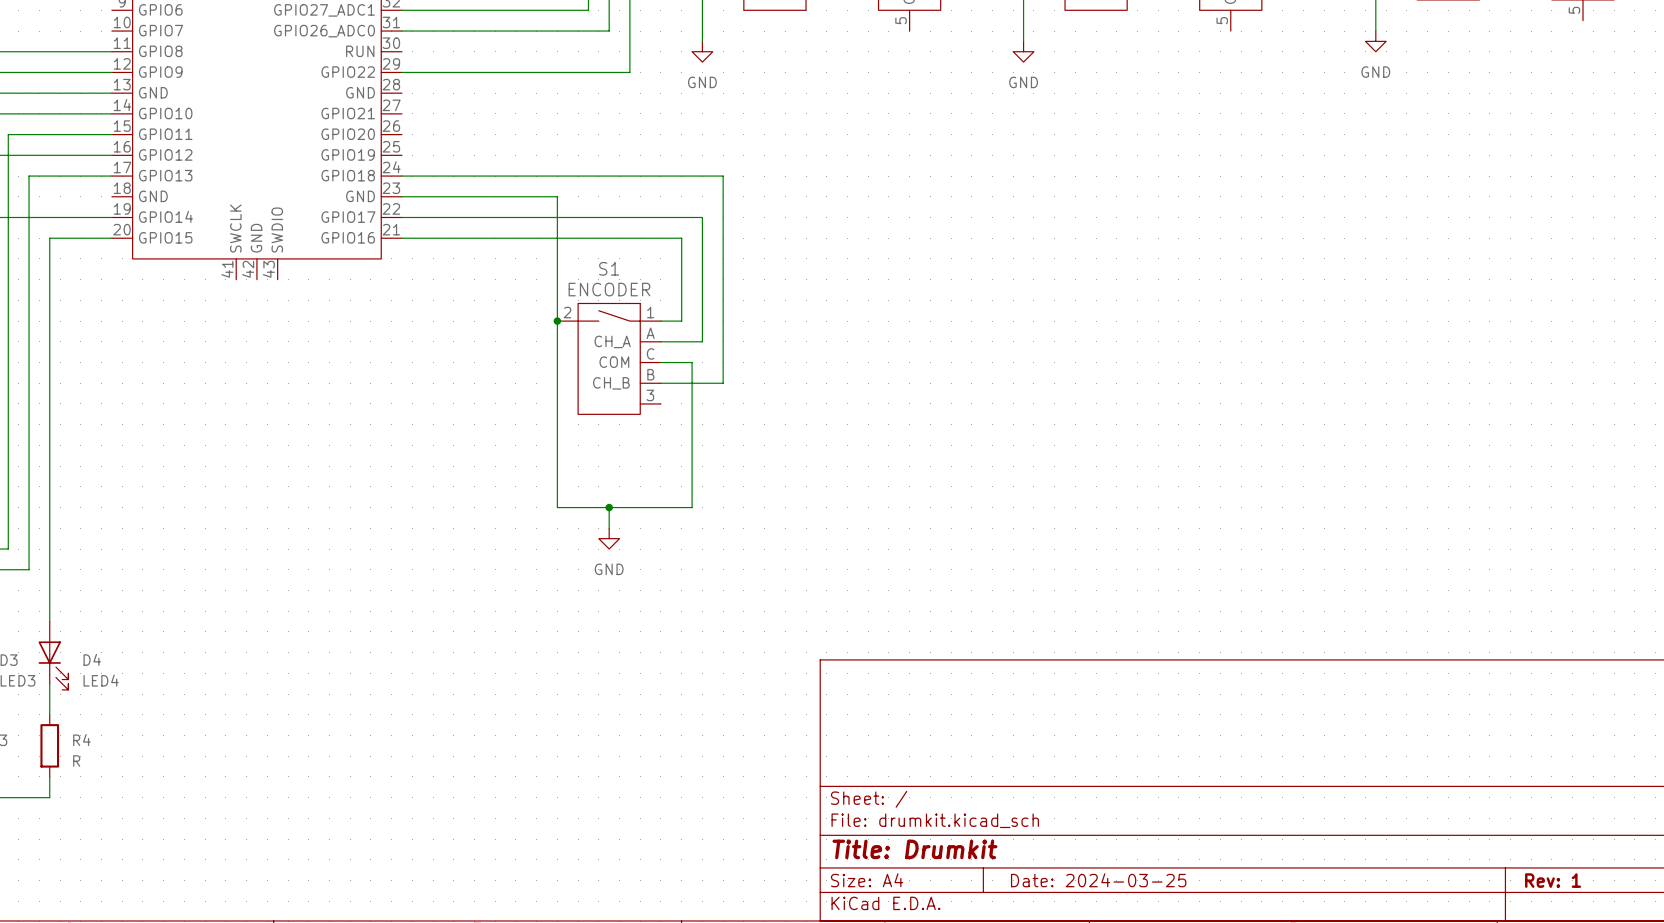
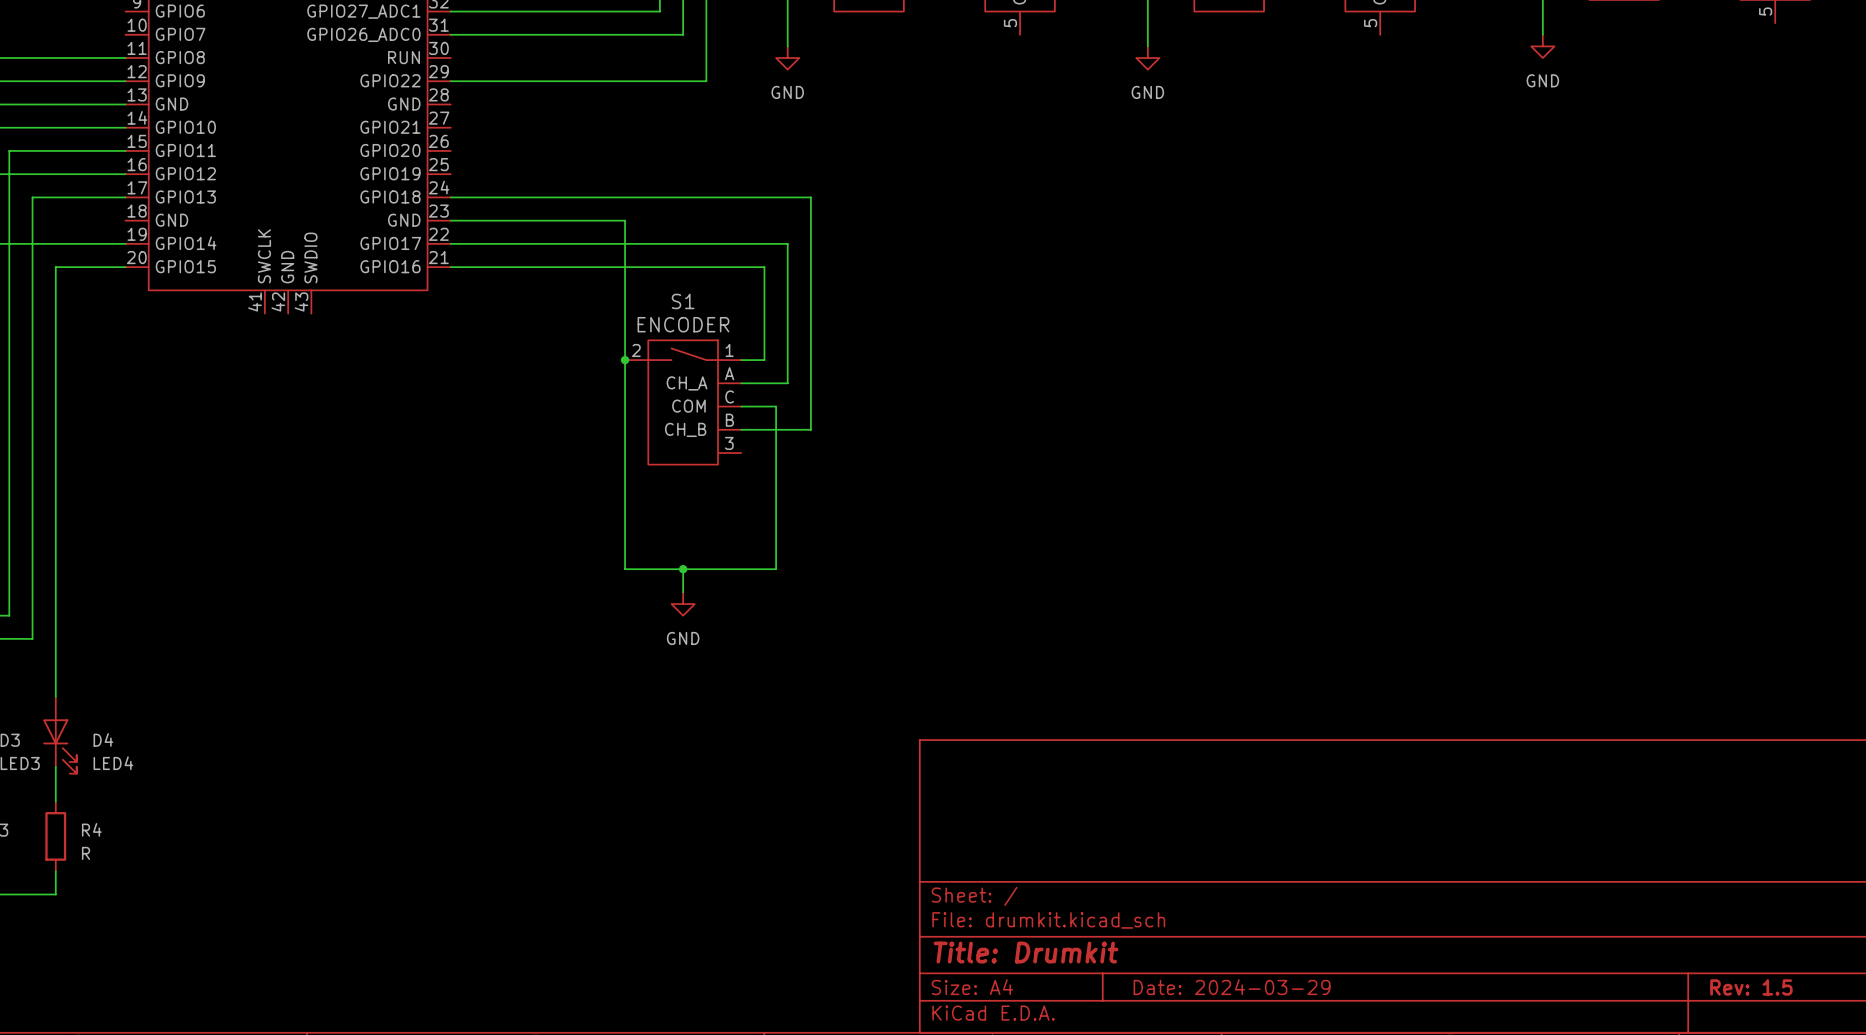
title block: Date: 2024-03-25 (1098, 880) -> Date: 2024-03-29 (1232, 987)
title block: Rev: 1 (1553, 880) -> Rev: 1.5 (1751, 987)

